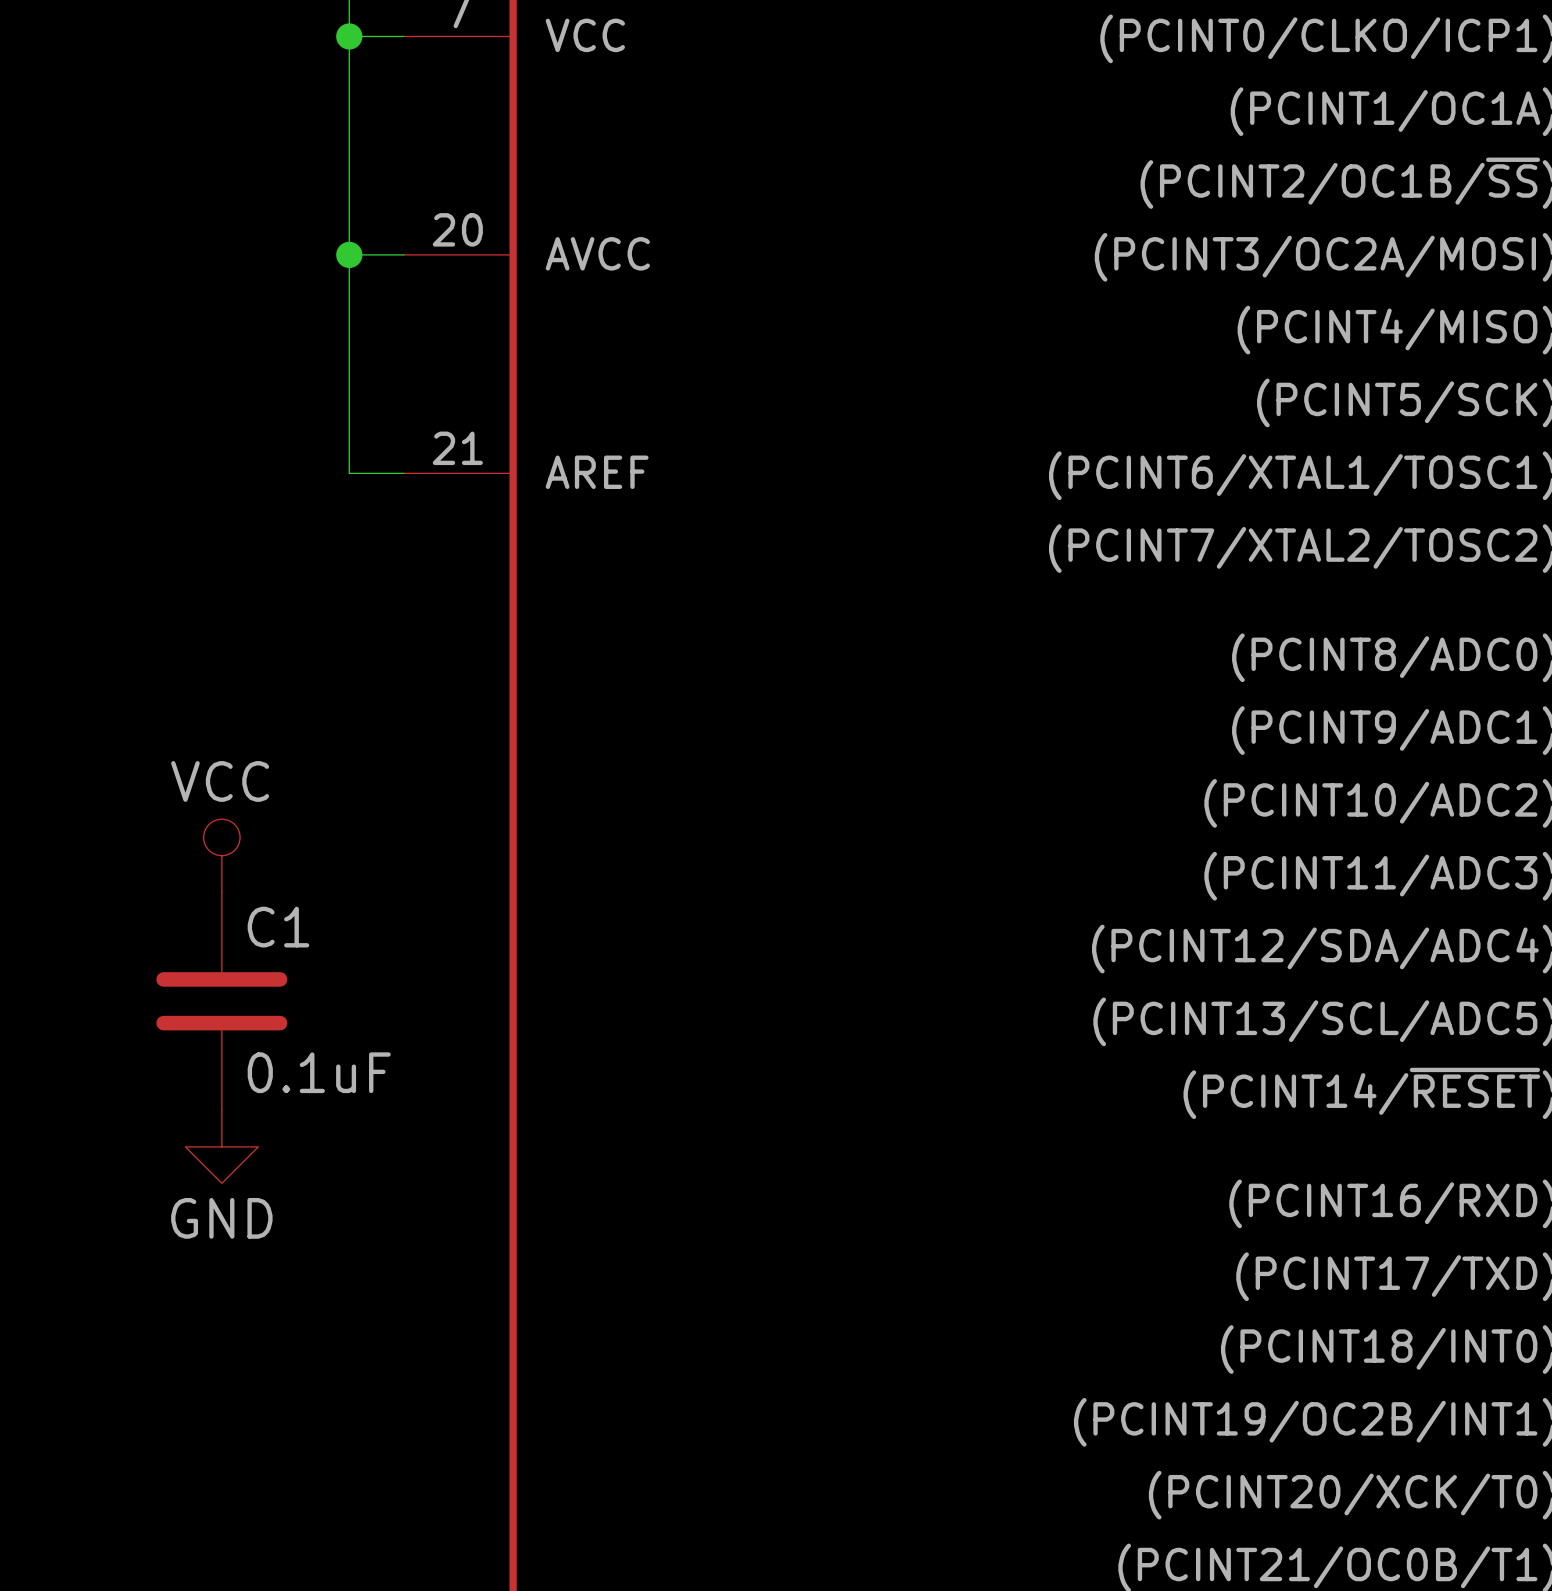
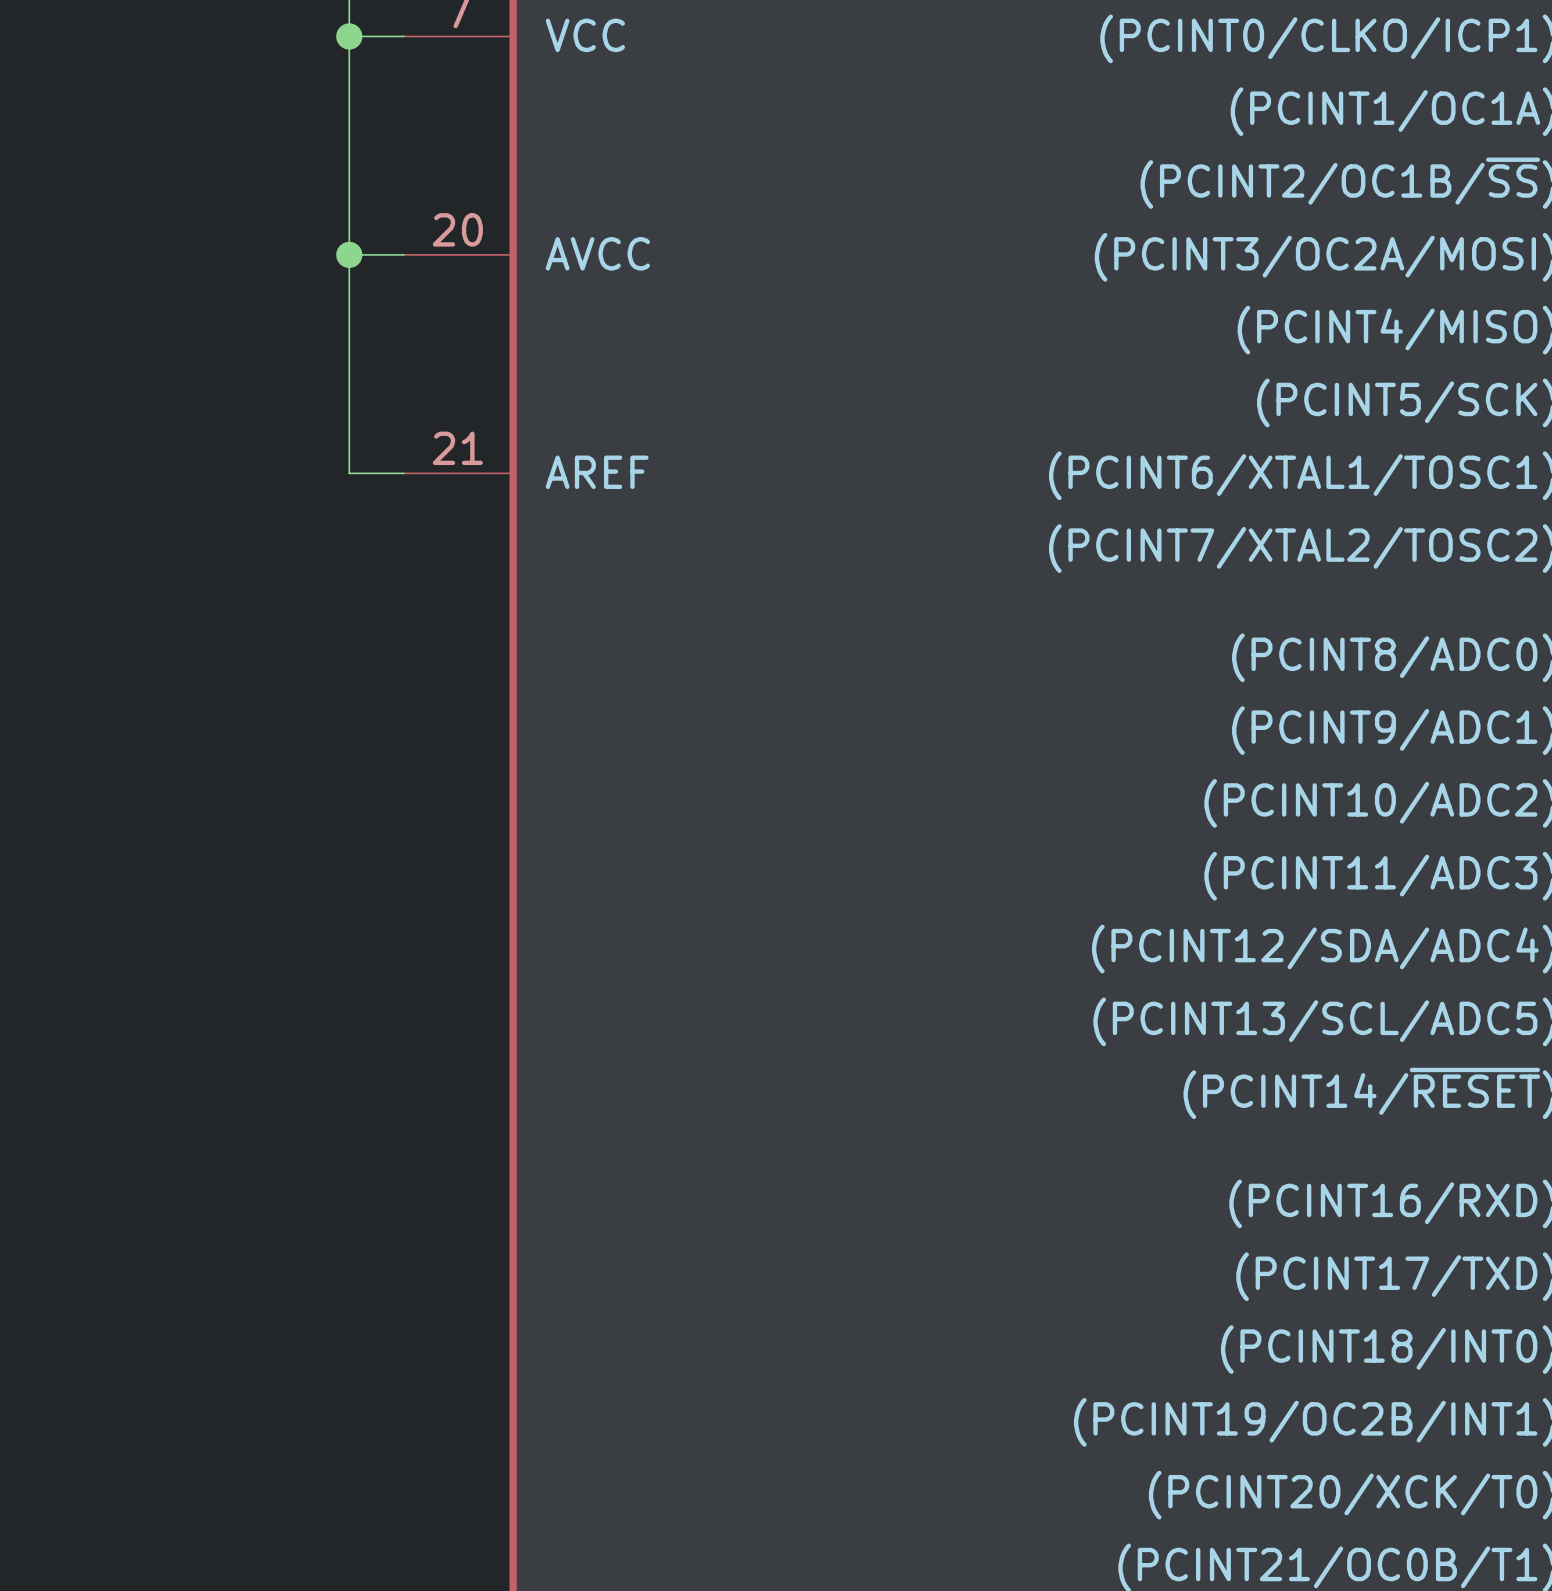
power symbol: VCC (221, 855) -> none
C1: 0.1uF (221, 1001) -> none
power symbol: GND (221, 1146) -> none

